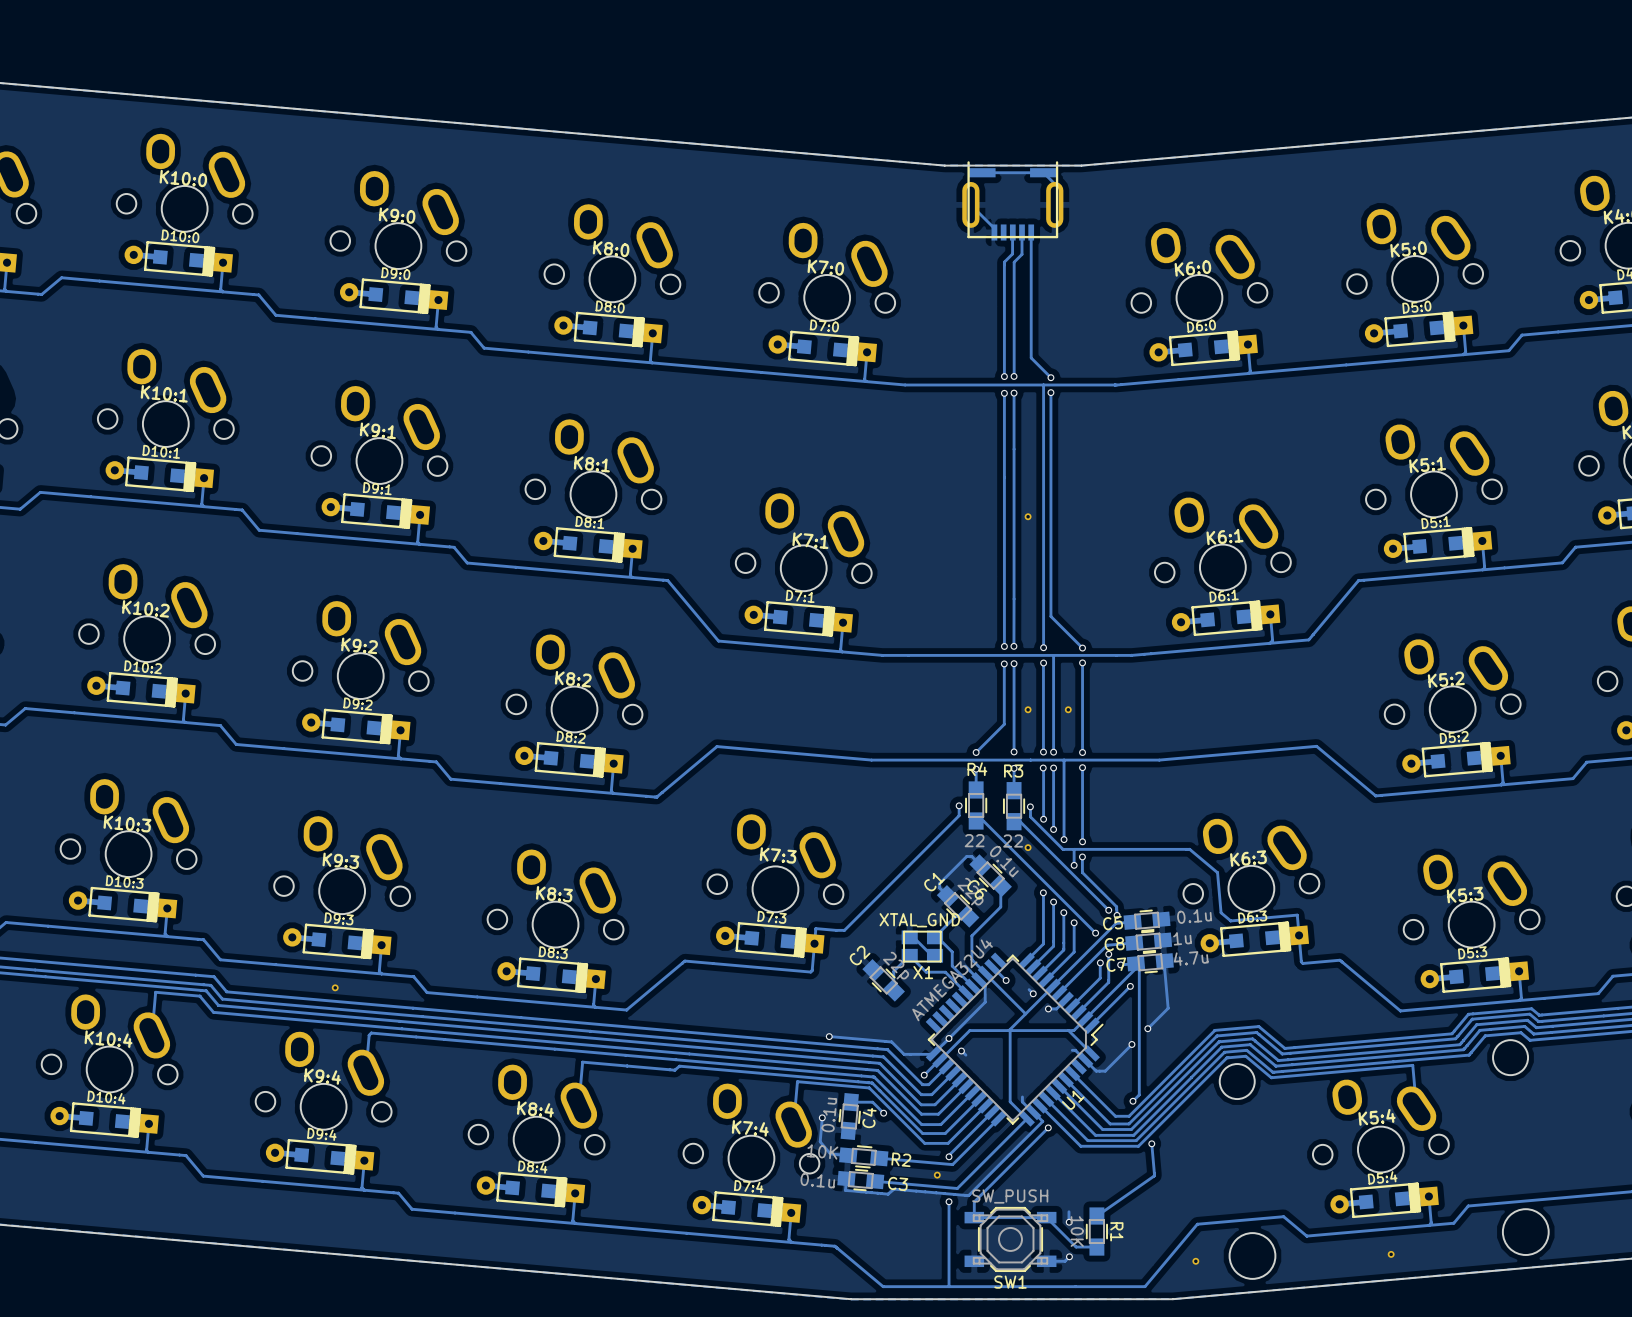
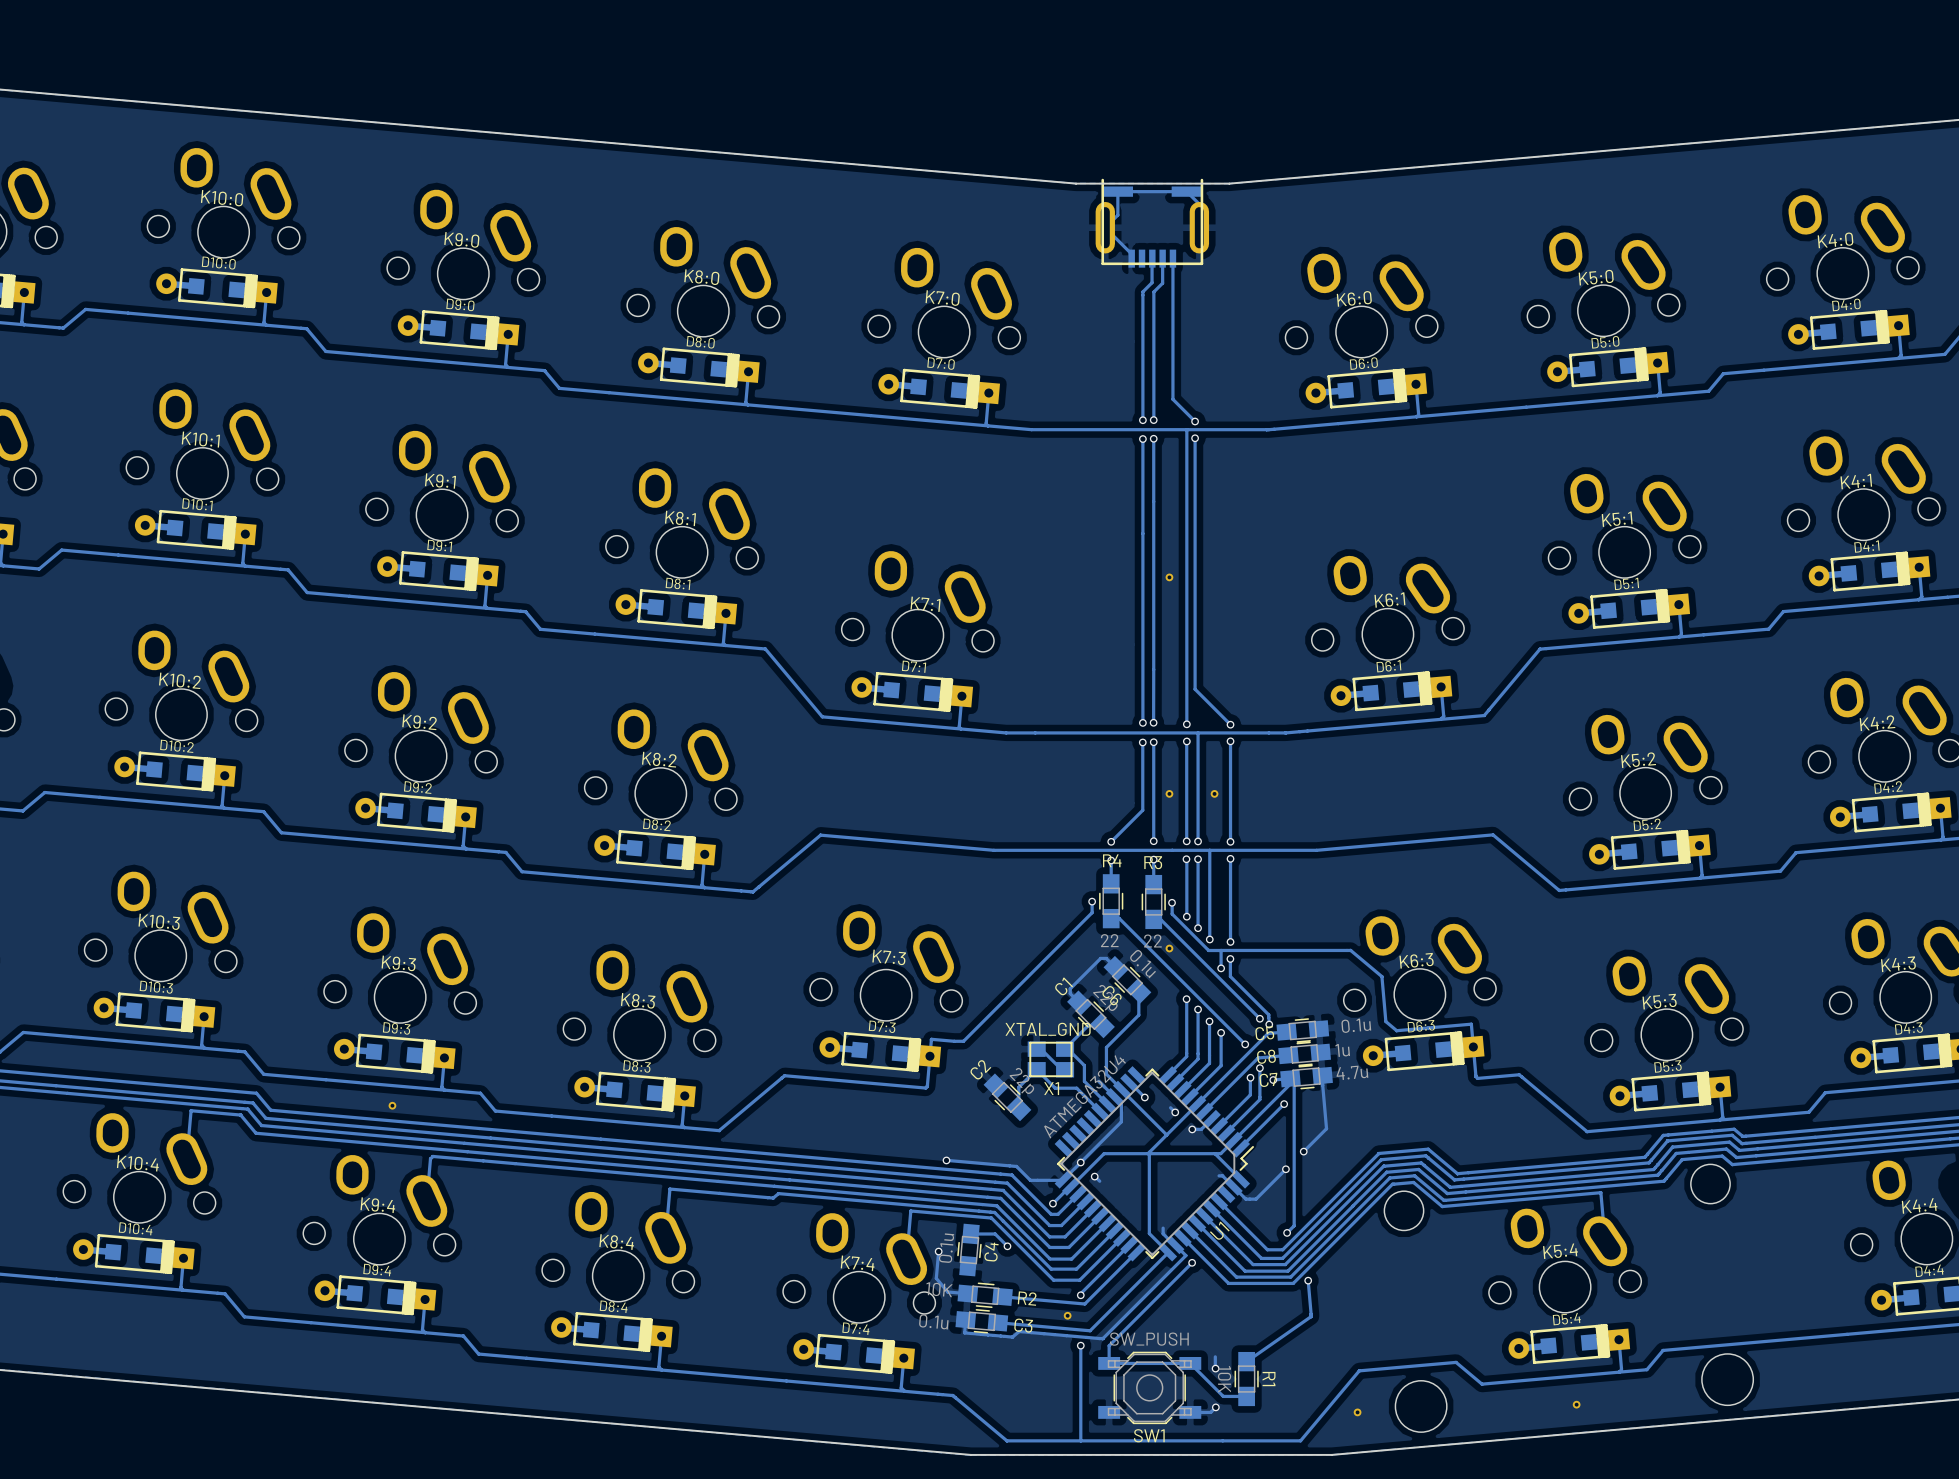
track: none -> (1117, 191) (1117, 215) (1105, 227)

